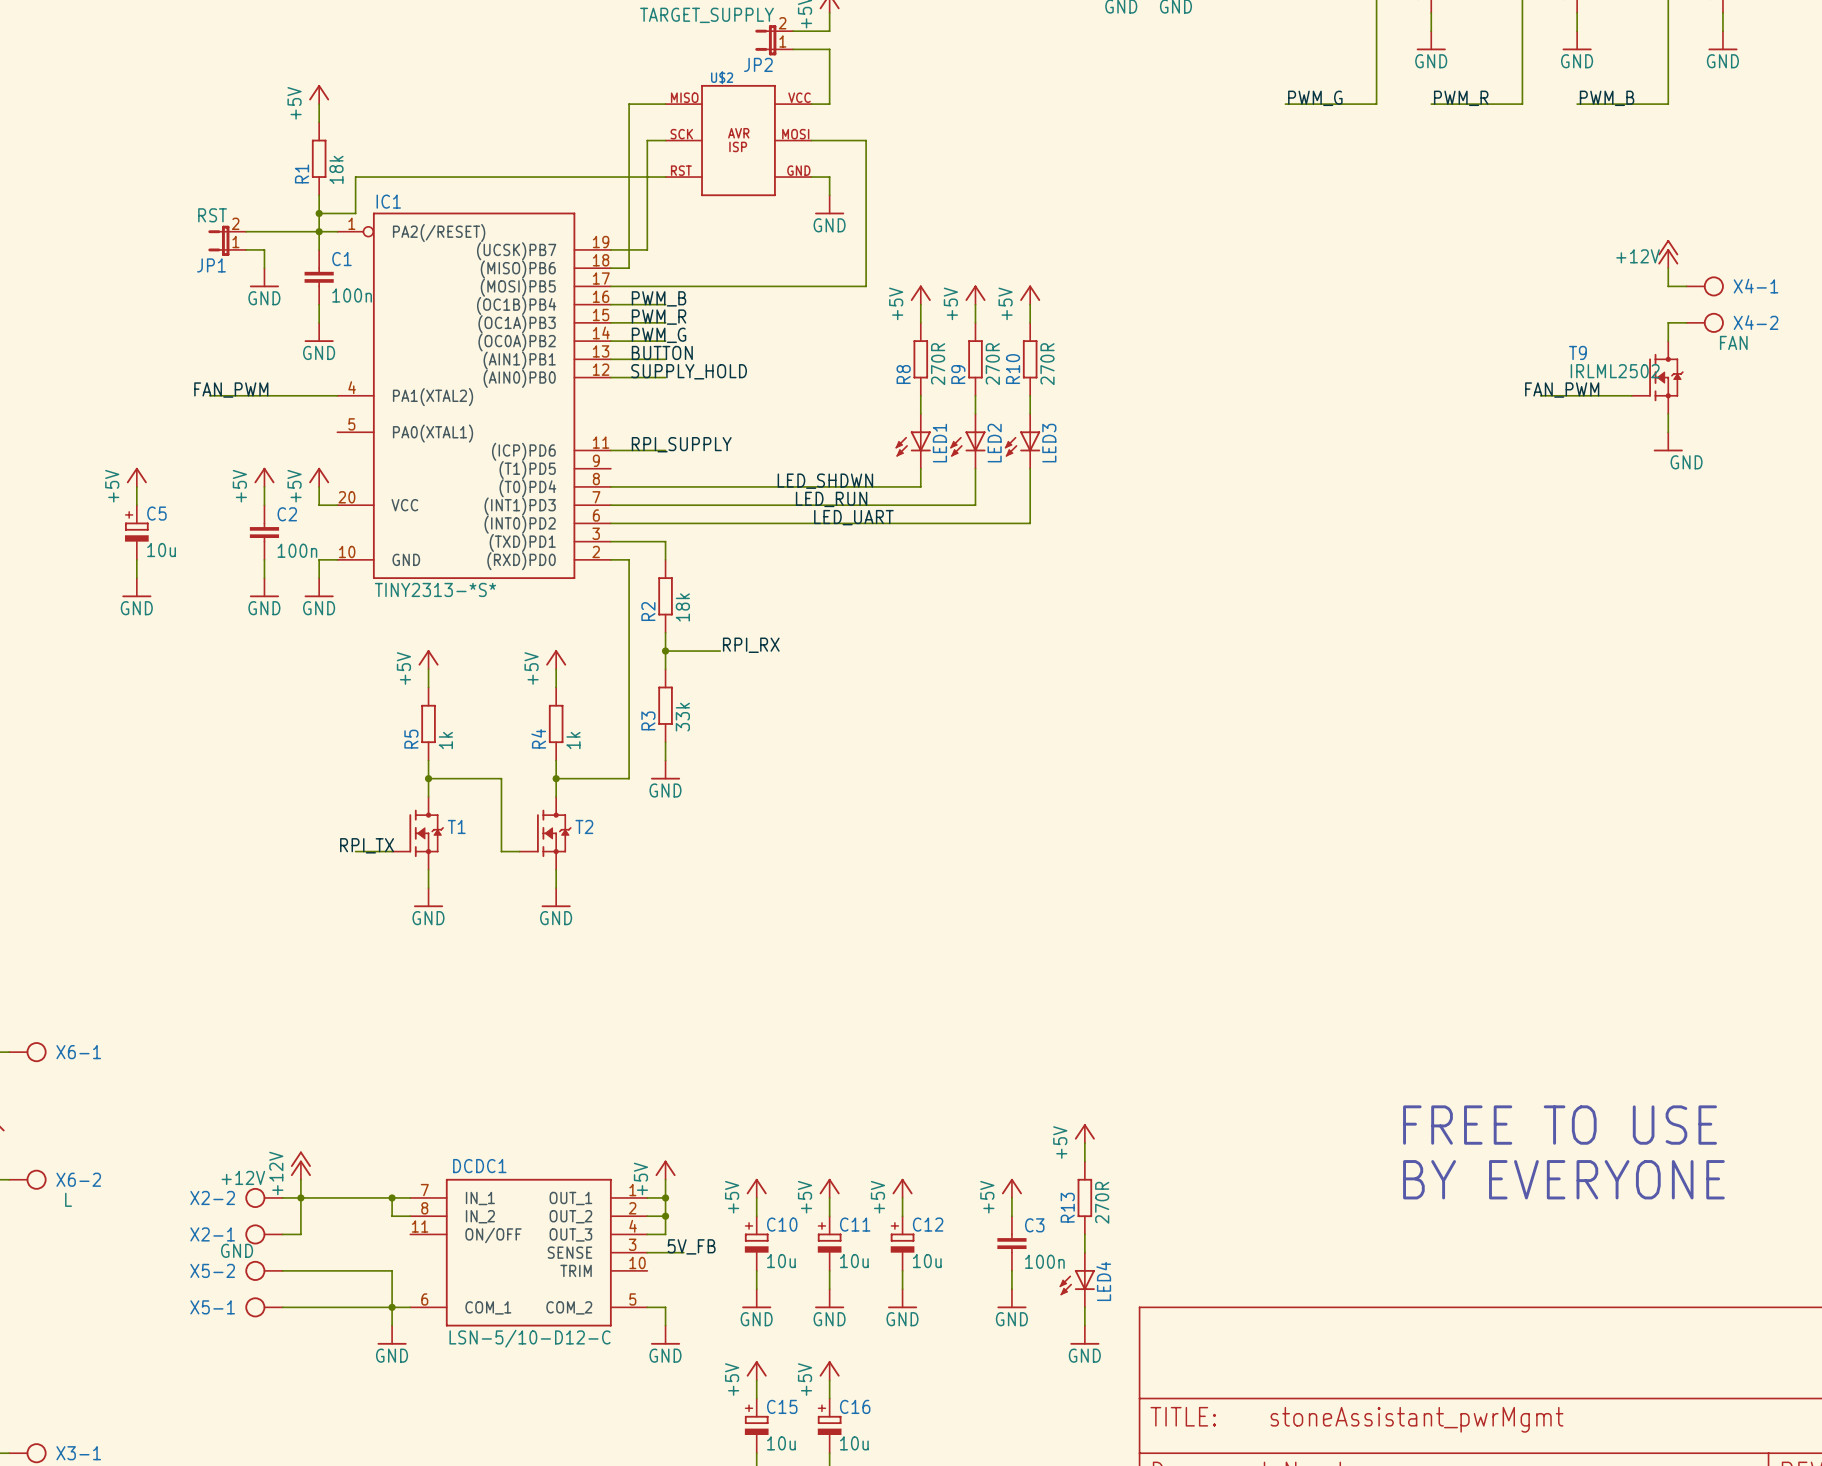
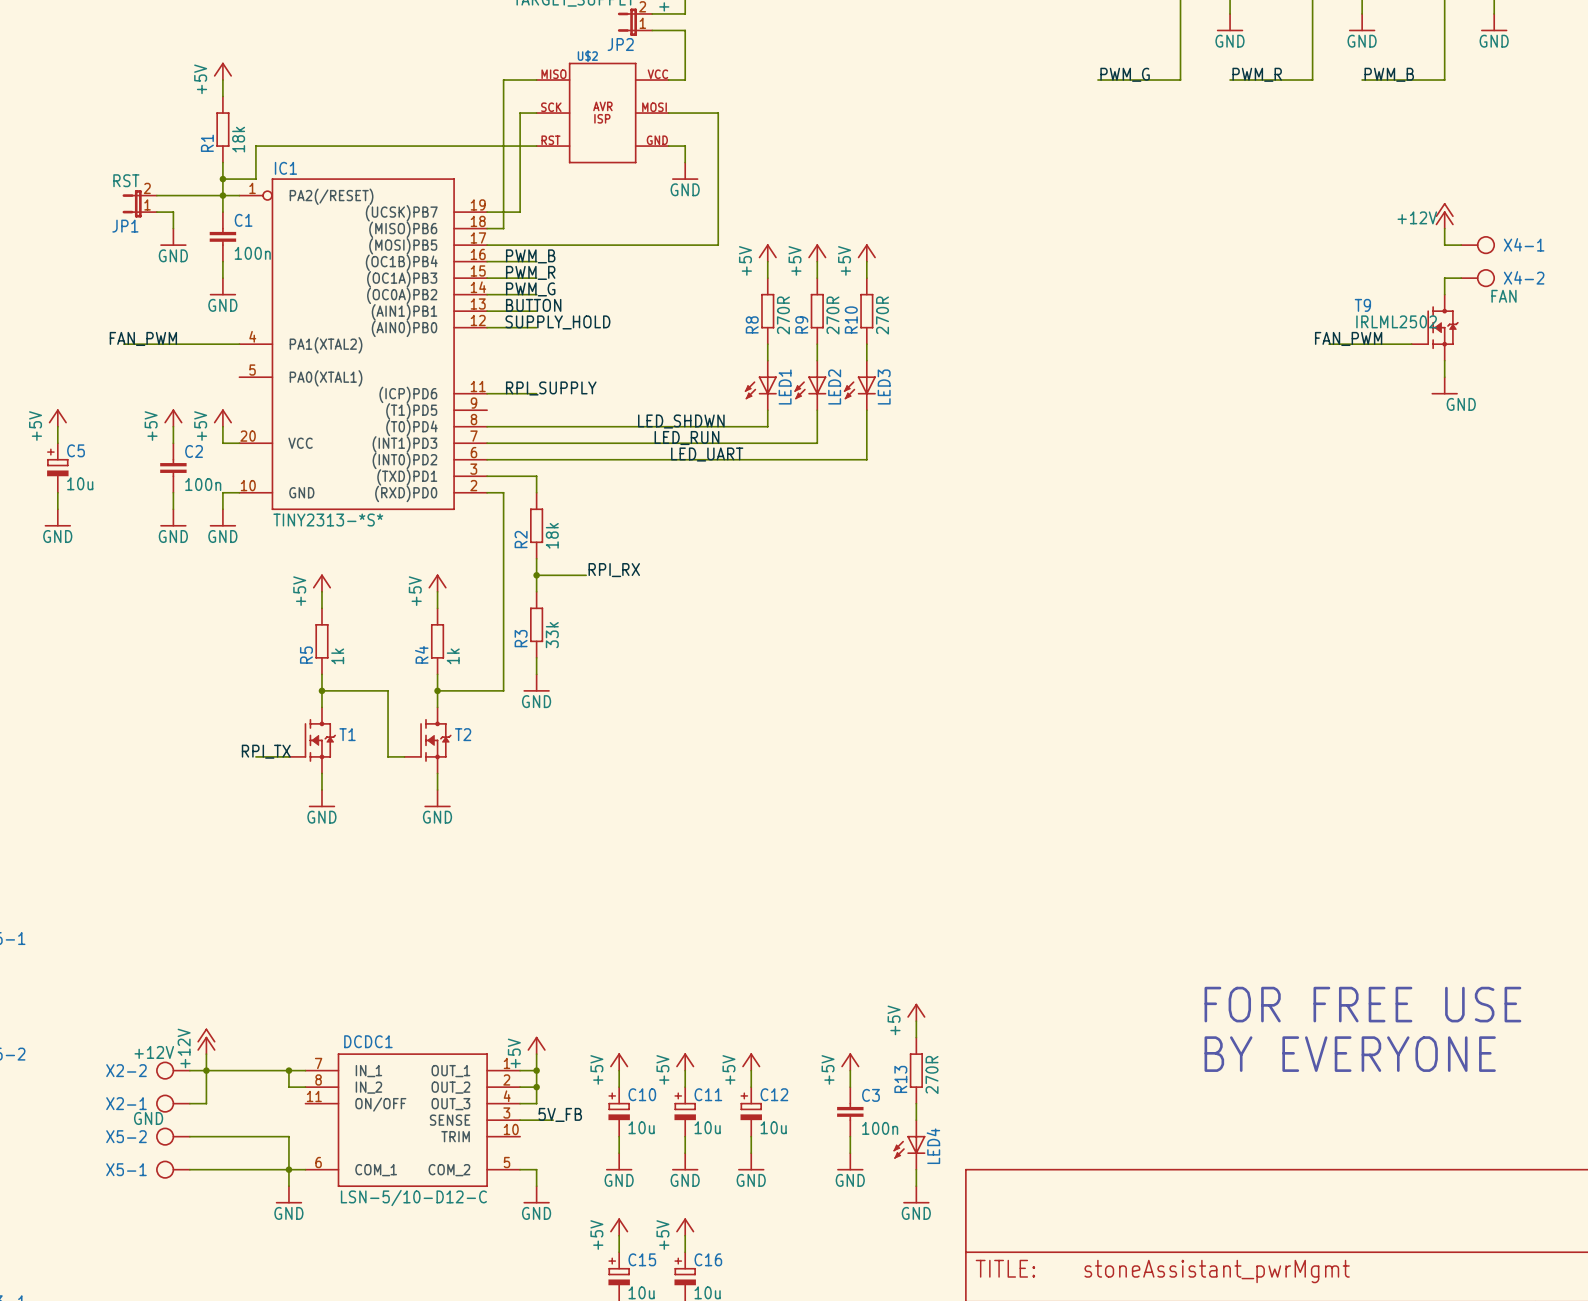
text: FREE TO USE (1560, 1125) -> FOR FREE USE (1362, 1004)

